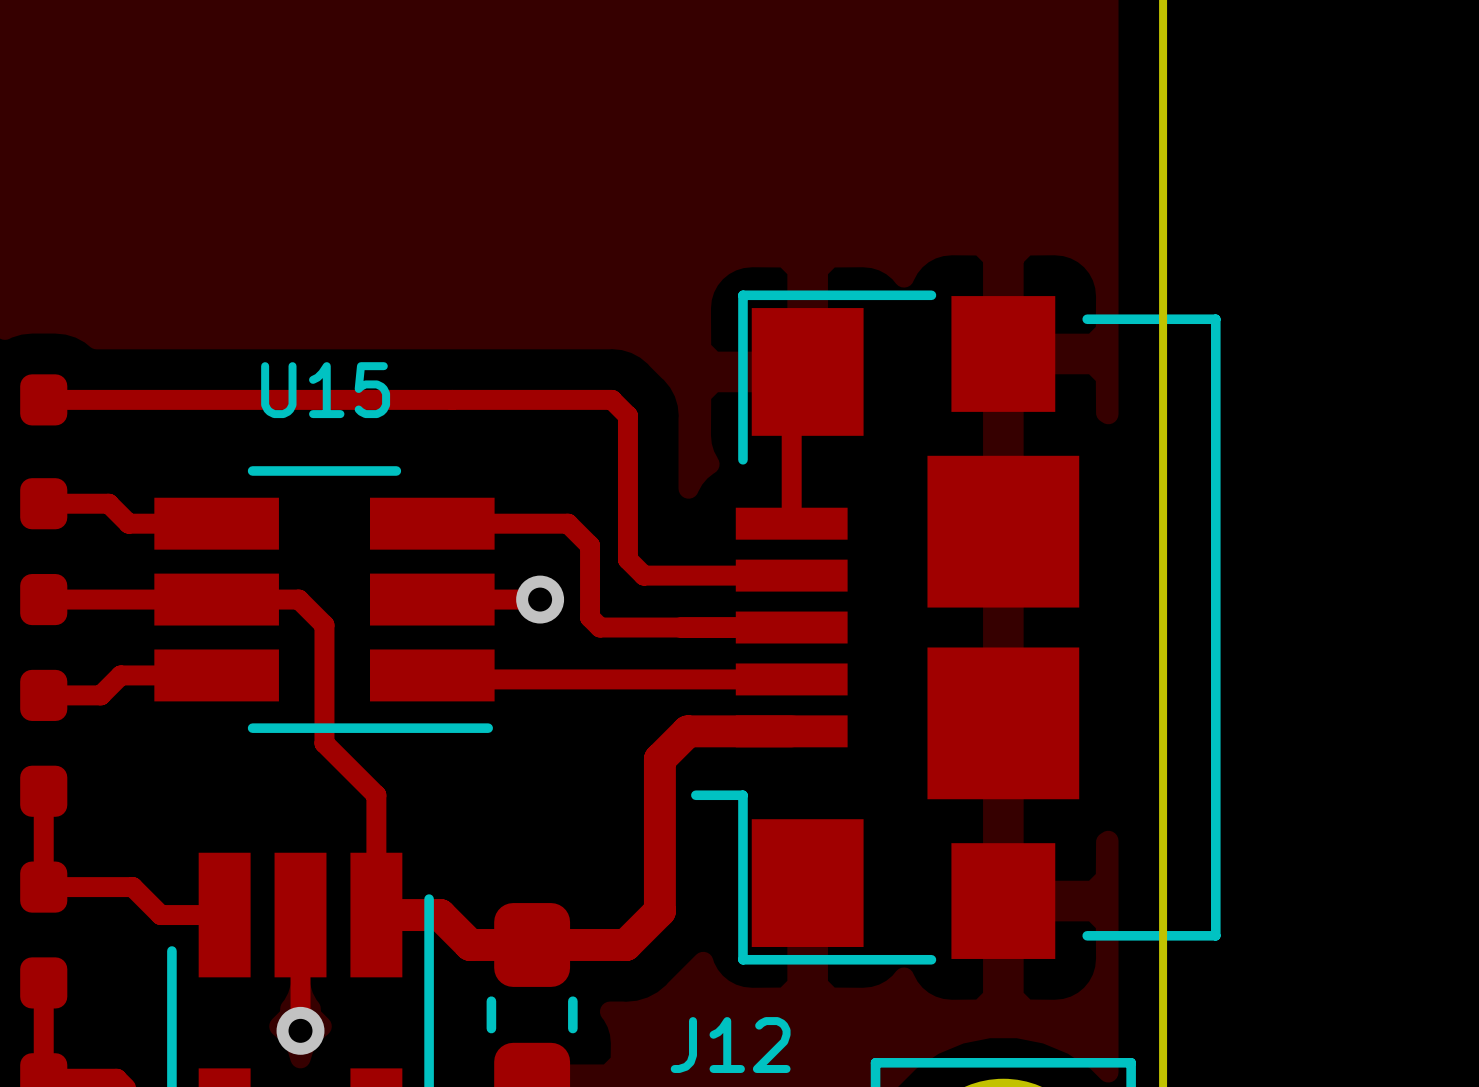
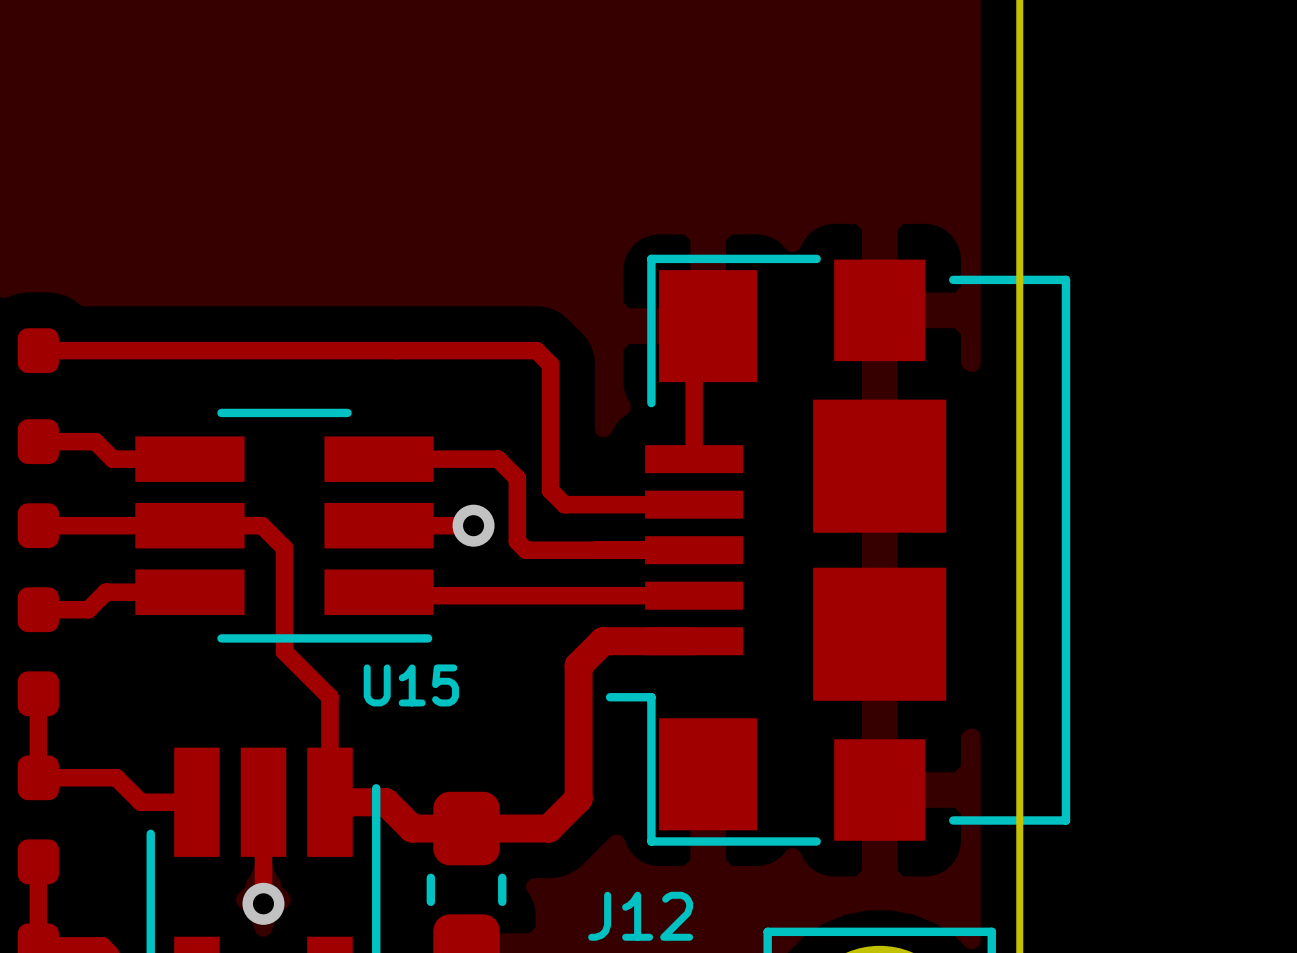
U15 name position: U15 (325, 390) -> U15 (411, 685)

